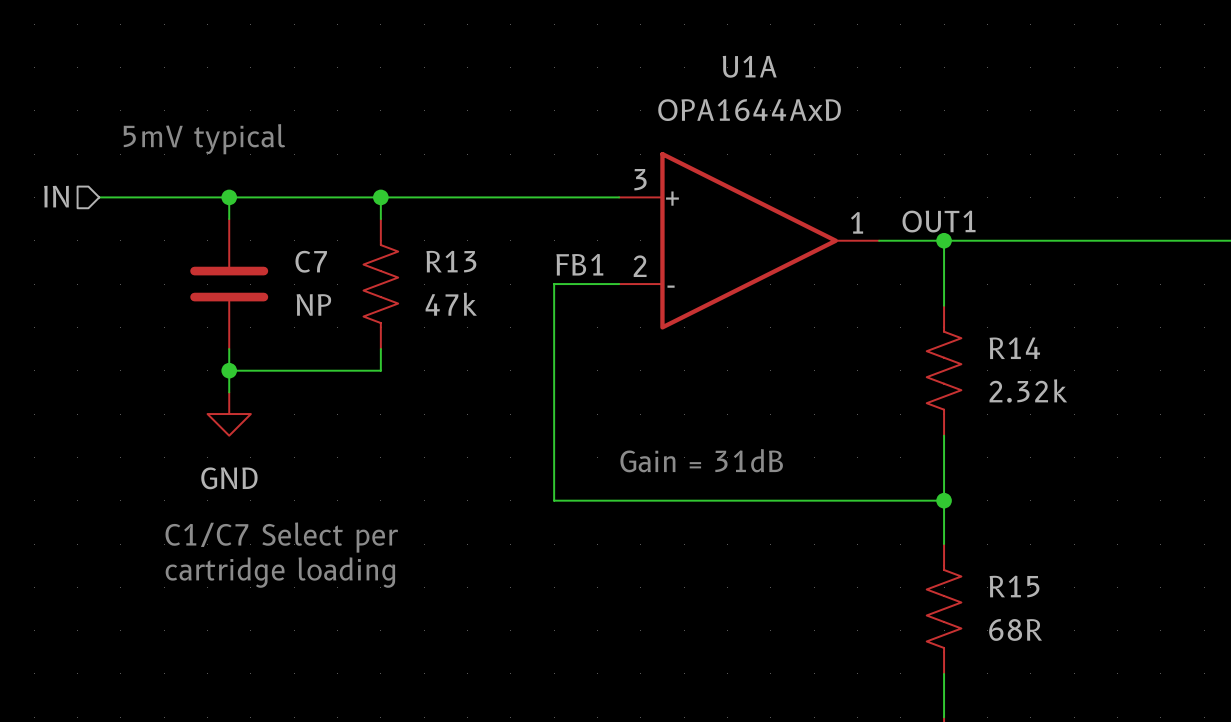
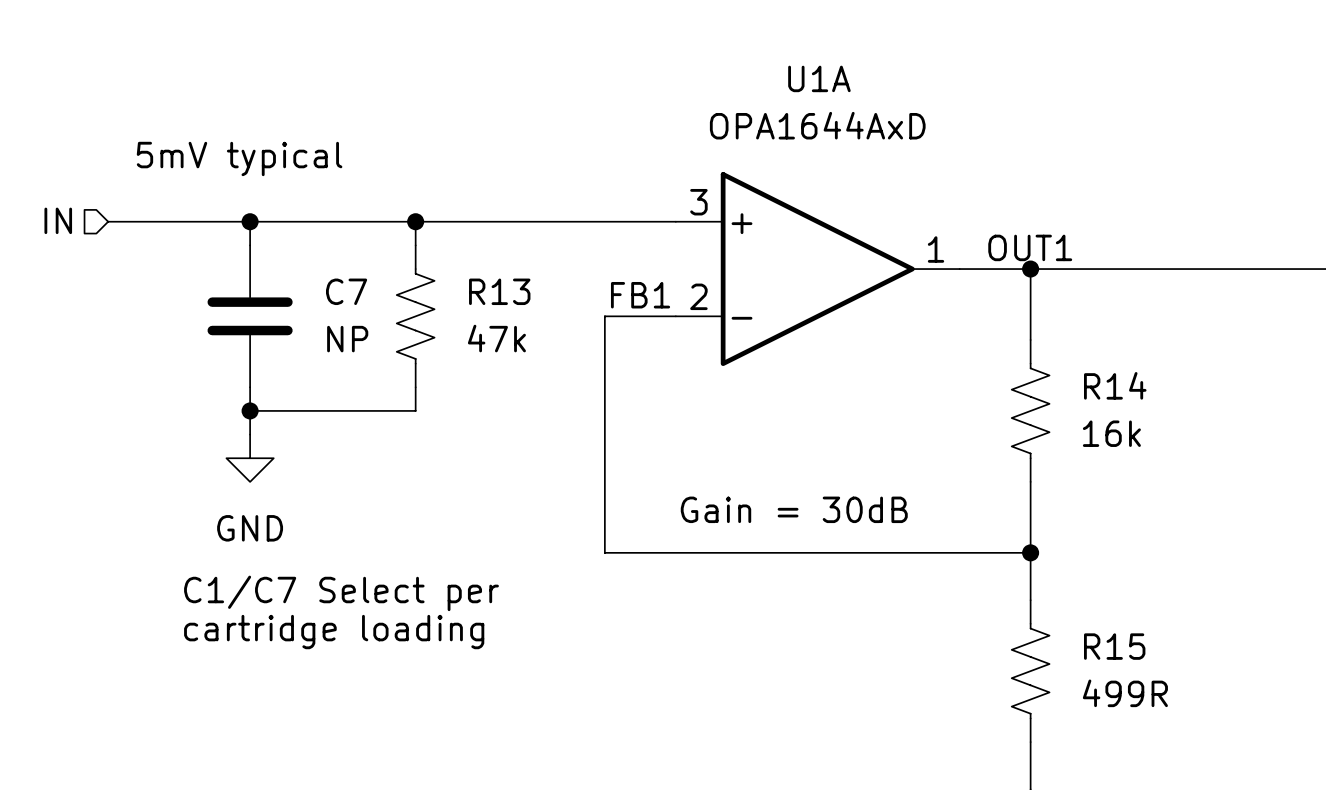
R14 value: 2.32k (1028, 390) -> 16k (1111, 433)
text: Gain = 31dB (701, 460) -> Gain = 30dB (794, 509)
R15 value: 68R (1015, 629) -> 499R (1125, 693)

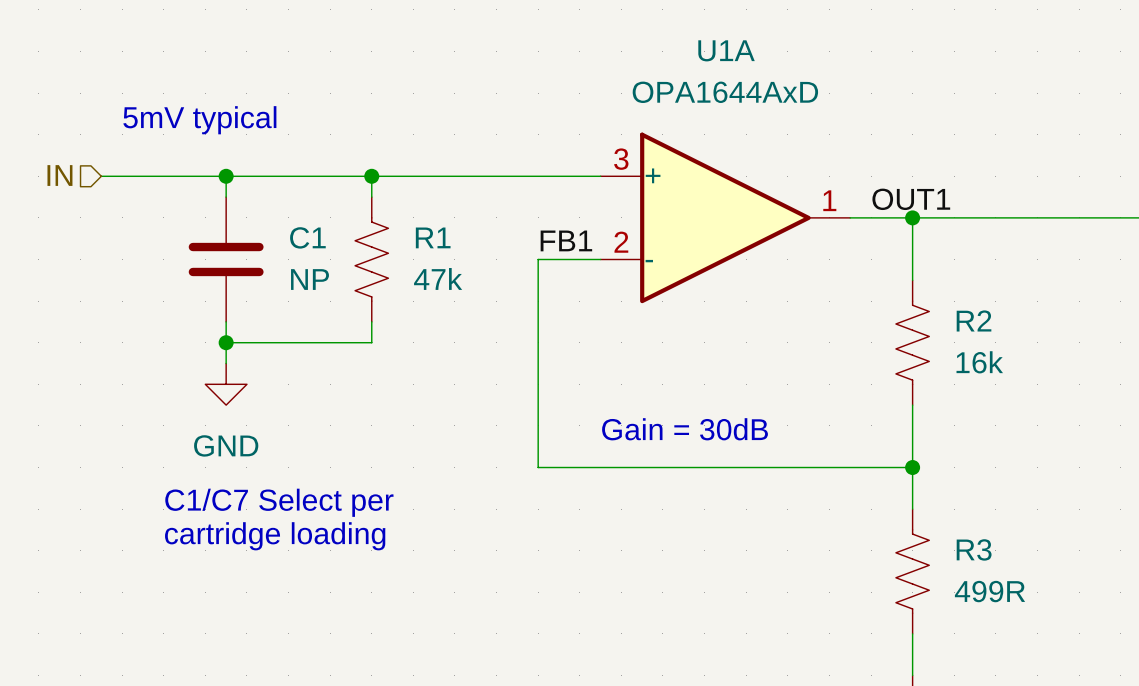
C7 name: C7 (346, 291) -> C1 (307, 237)
R13 name: R13 (499, 291) -> R1 (433, 237)
R14 name: R14 (1115, 385) -> R2 (974, 320)
R15 name: R15 (1114, 646) -> R3 (974, 549)

